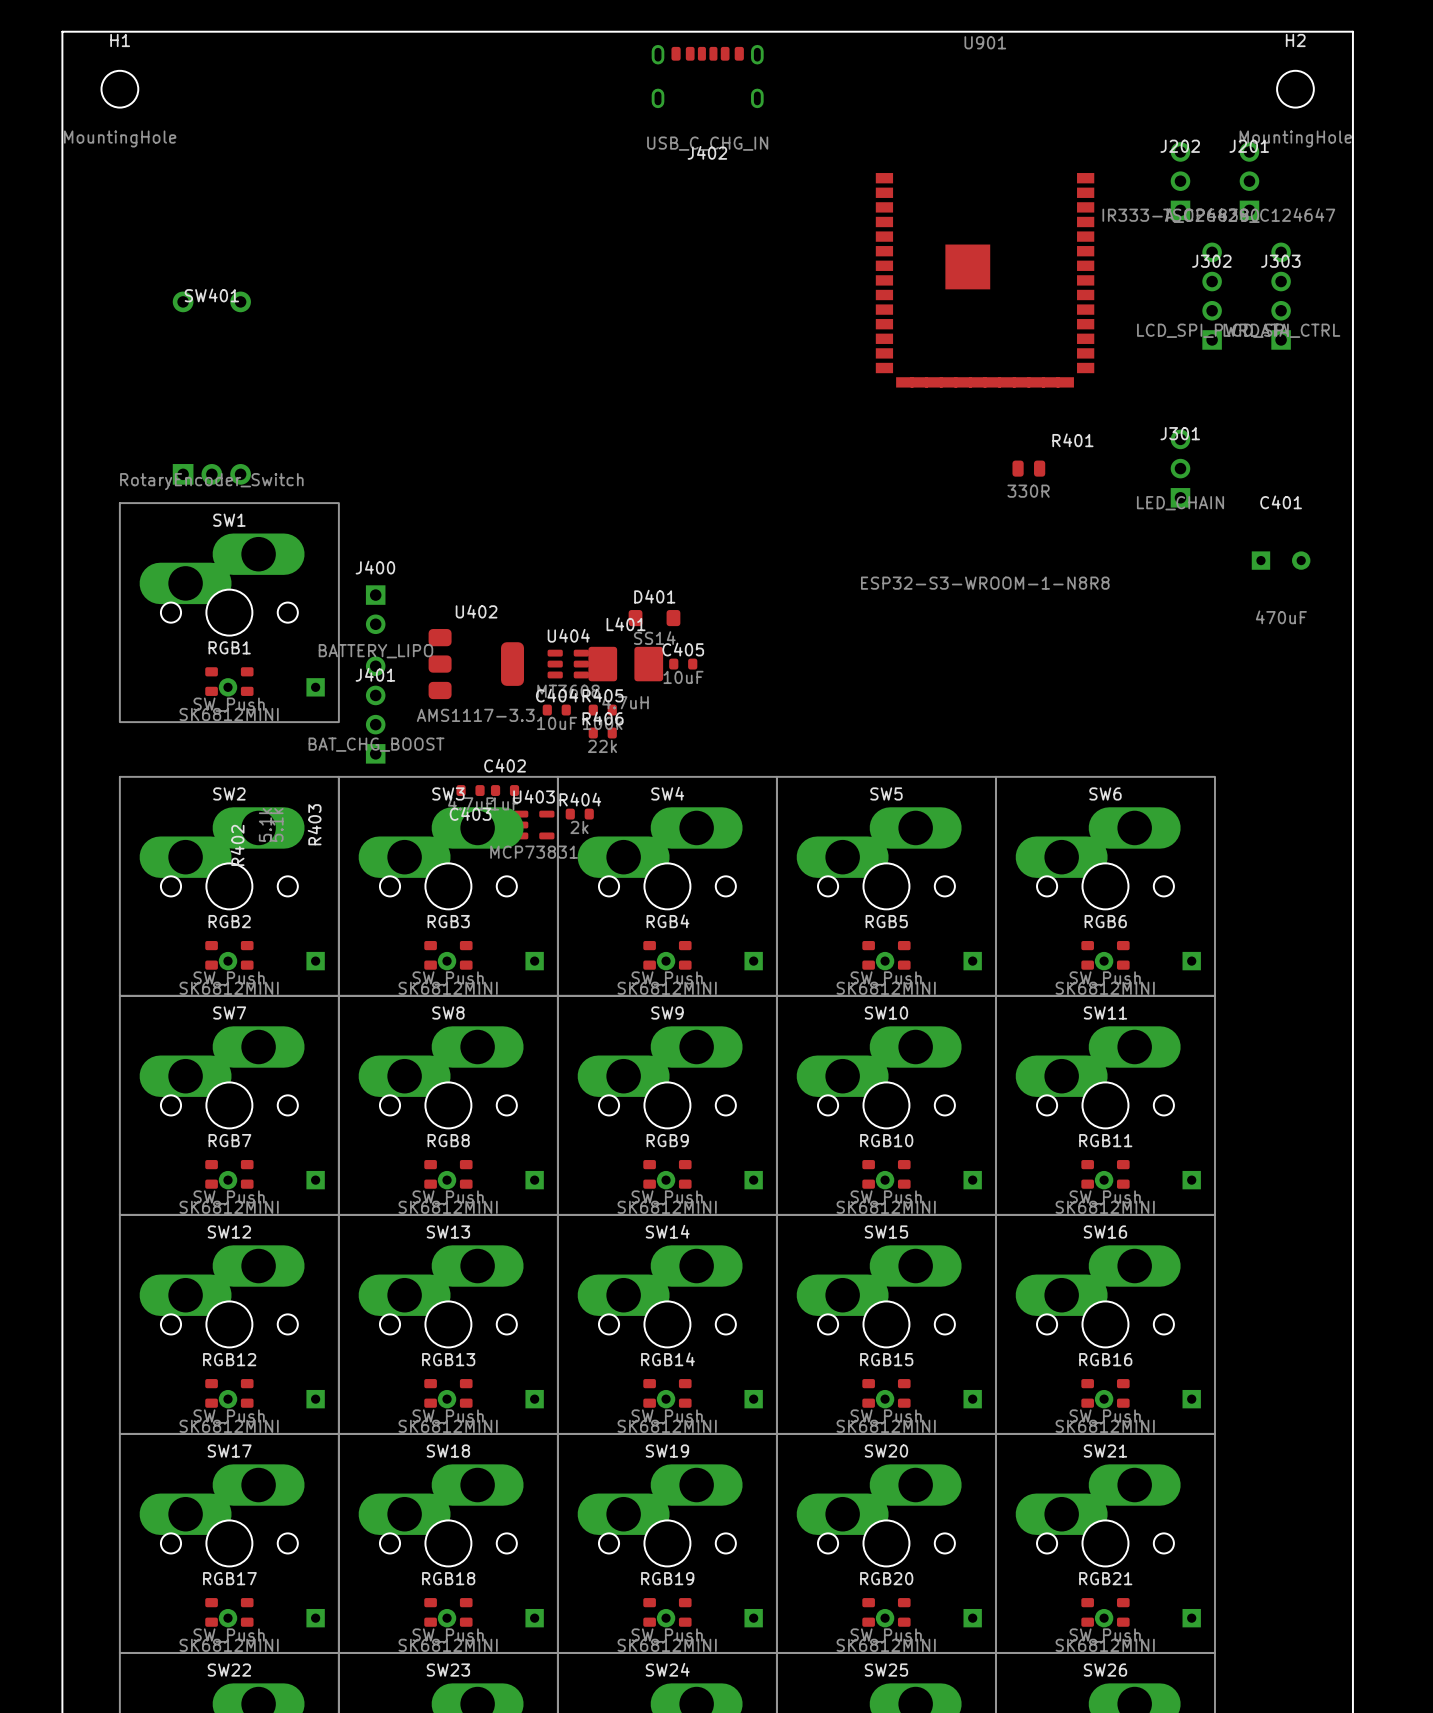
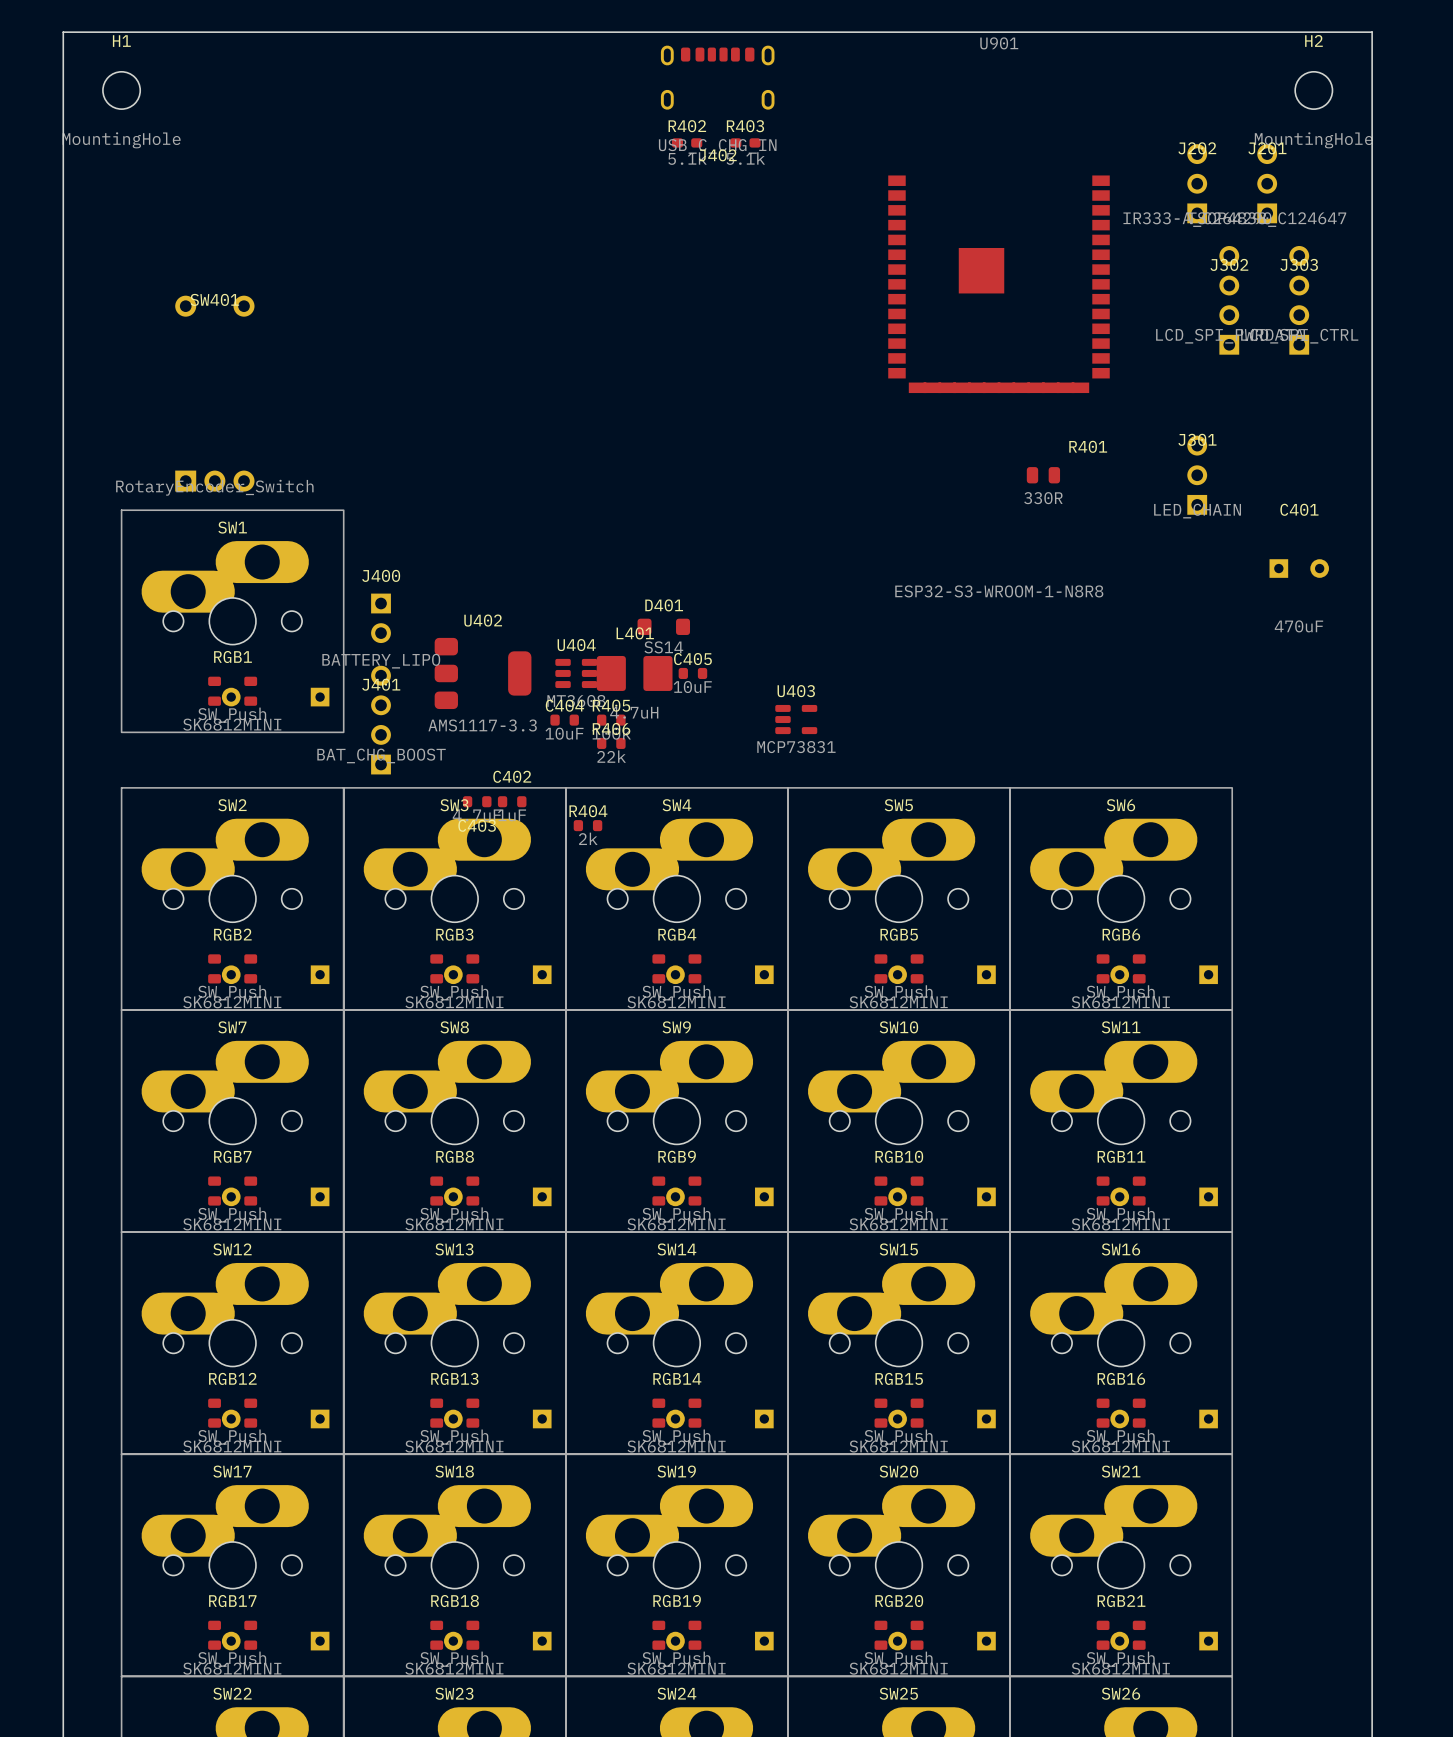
R402 footprint: [246, 810, 258, 840] -> [671, 138, 703, 148]
R403 footprint: [258, 810, 270, 840] -> [730, 138, 761, 148]
R403 name position: R403 (314, 824) -> R403 (745, 126)
U403 position: (533, 825) -> (796, 719)
R402 name position: R402 (237, 845) -> R402 (687, 126)

